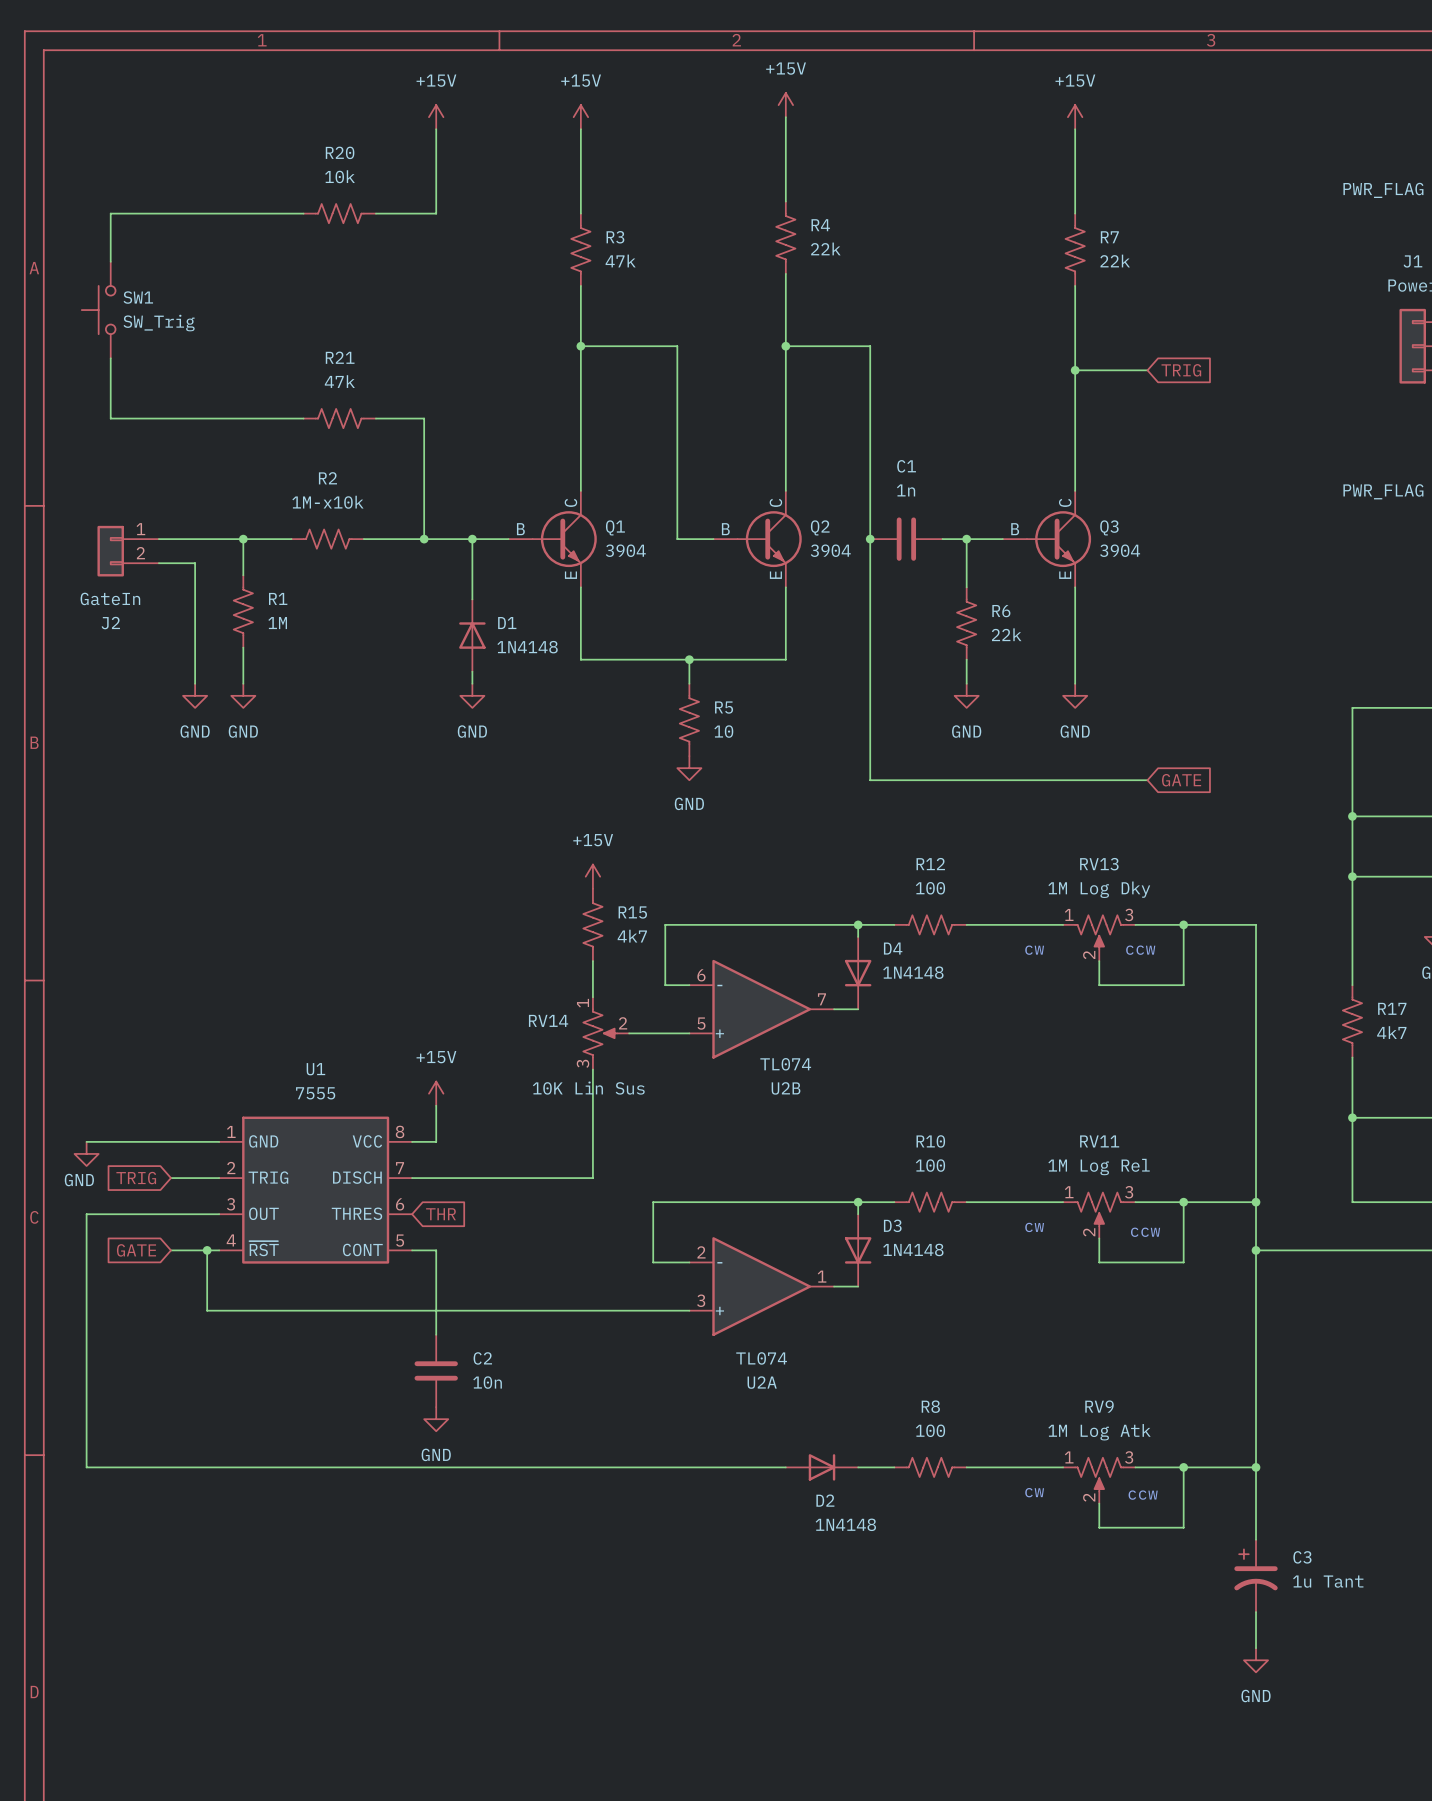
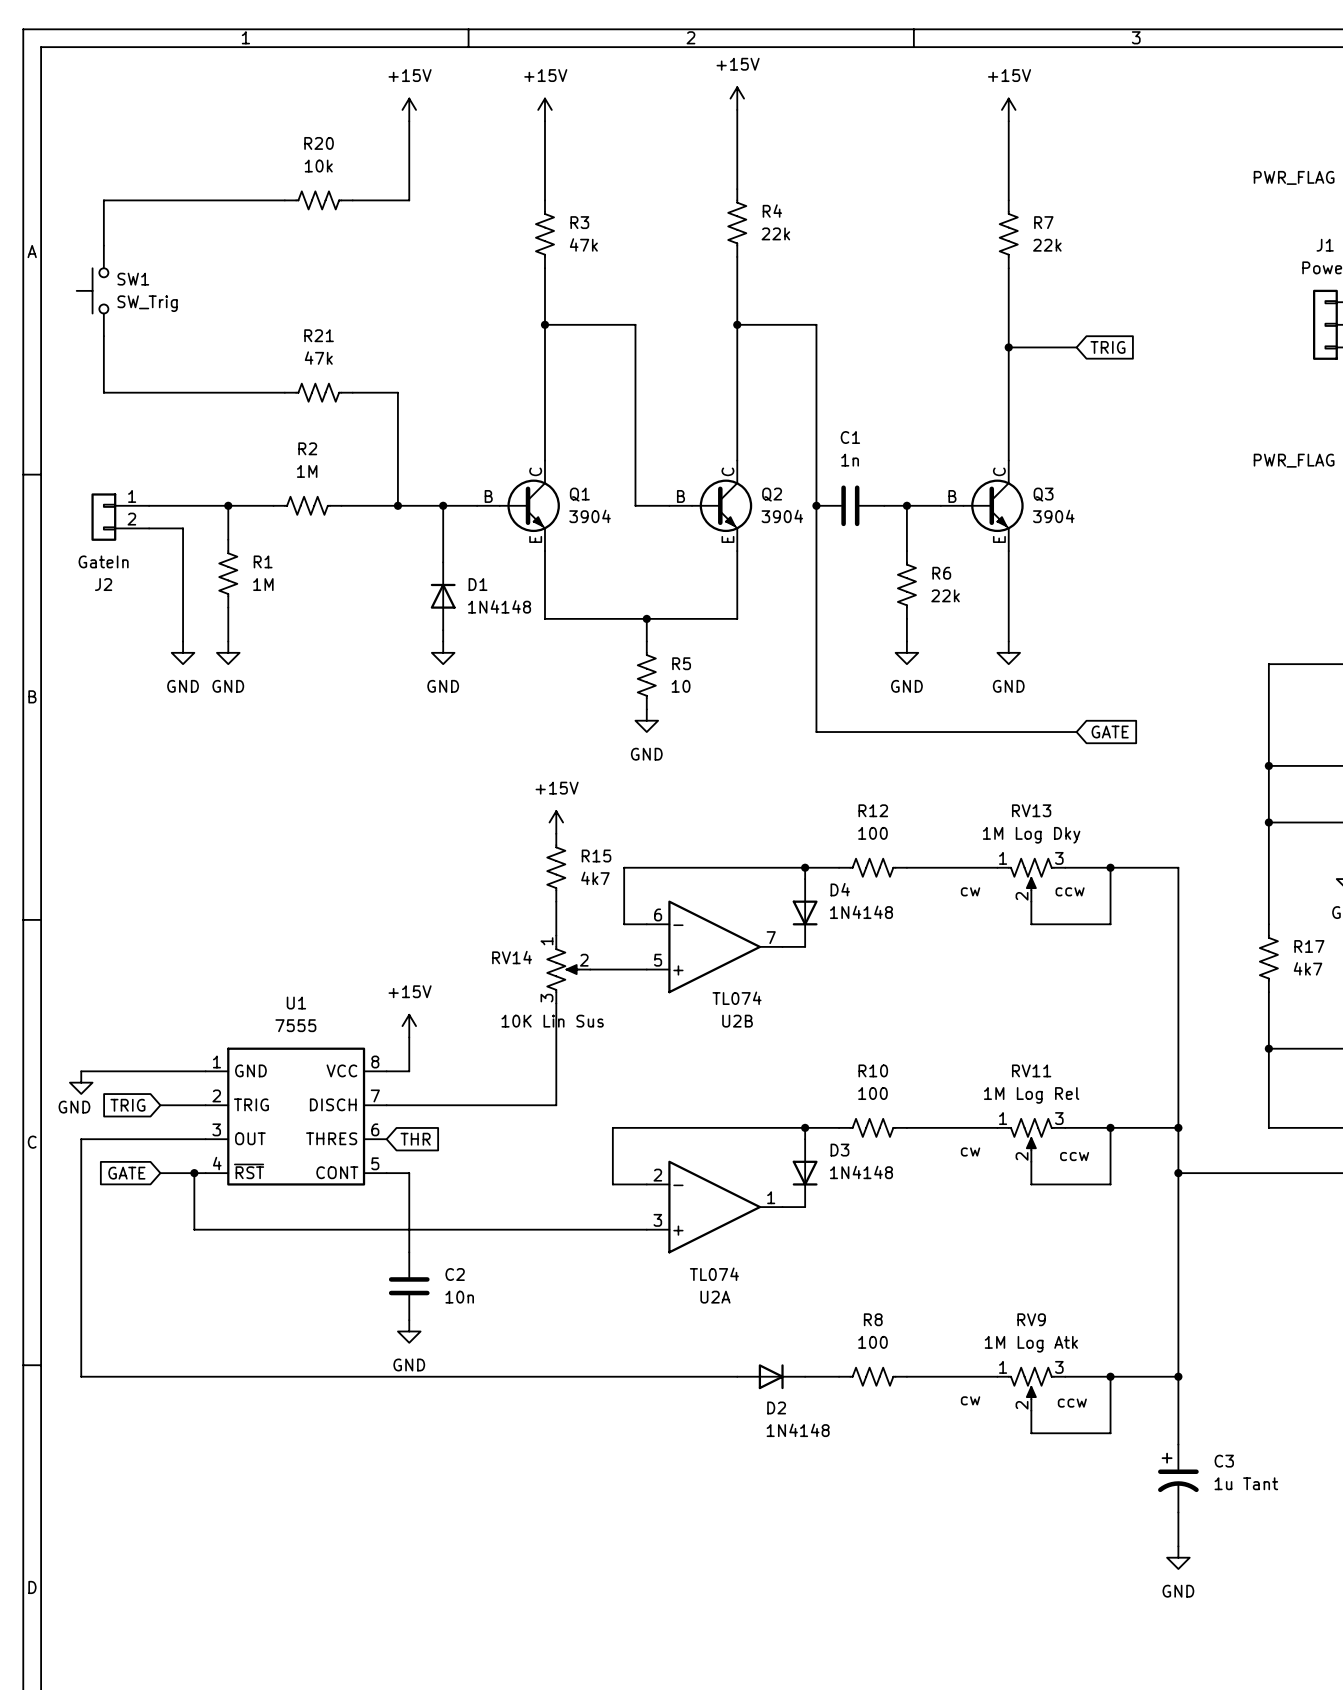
R2 value: 1M-x10k (327, 502) -> 1M (307, 471)

